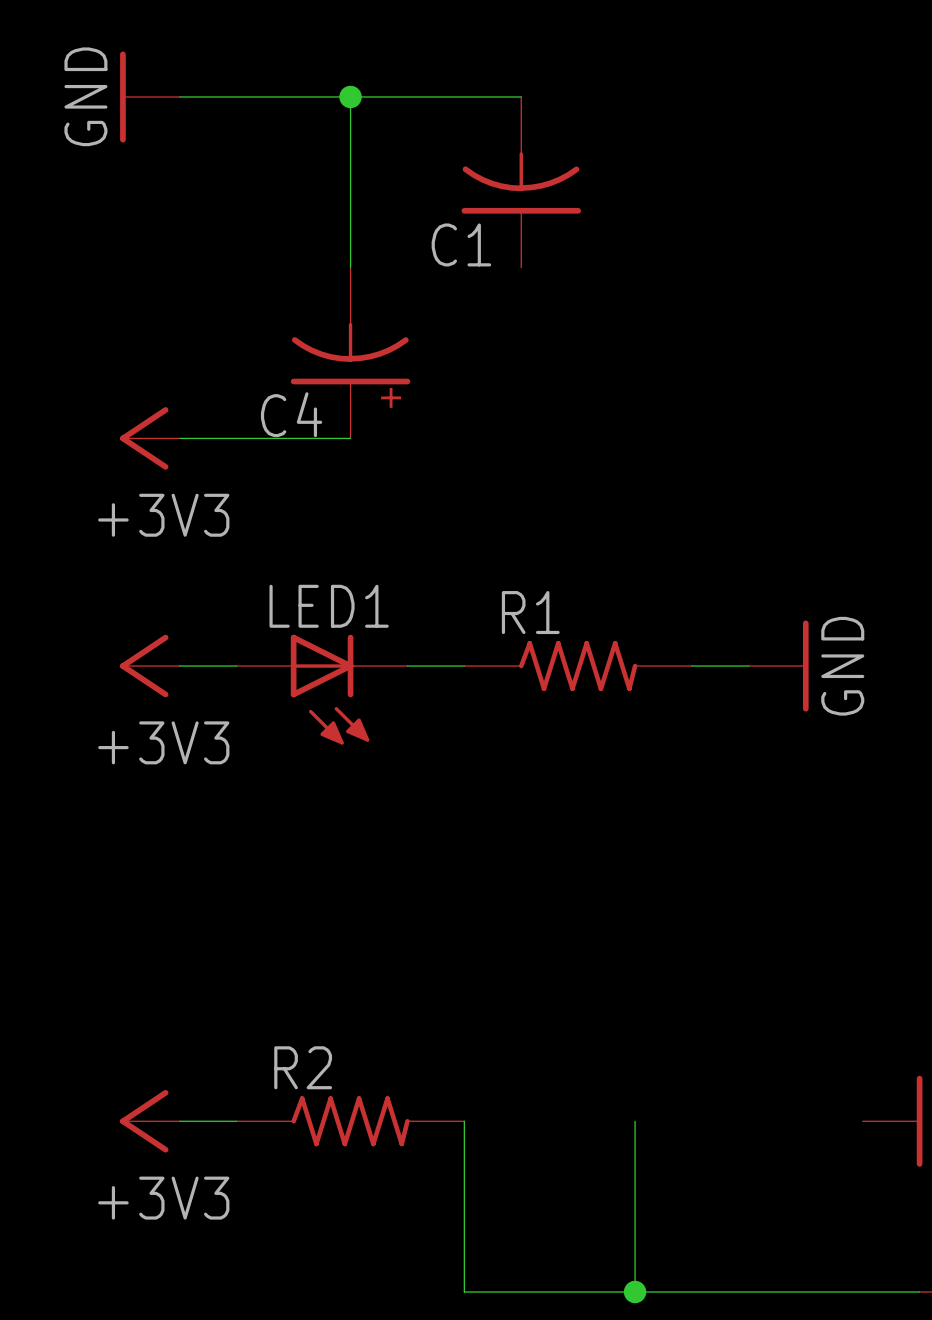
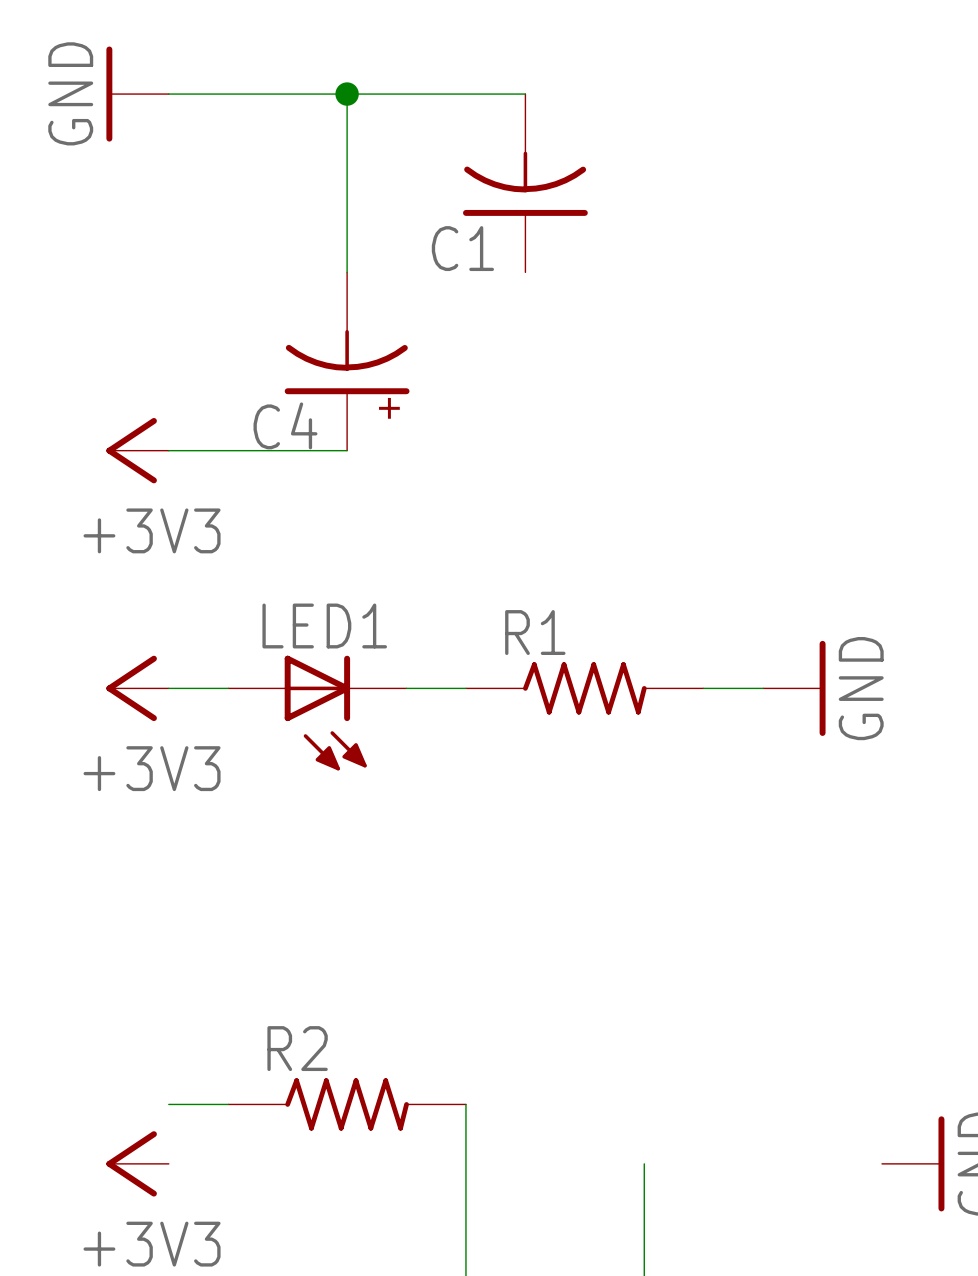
wire: none -> (465, 1104) (465, 1163)
wire: (179, 1121) (236, 1121) -> (168, 1104) (228, 1104)
R2 position: (350, 1121) -> (347, 1104)

